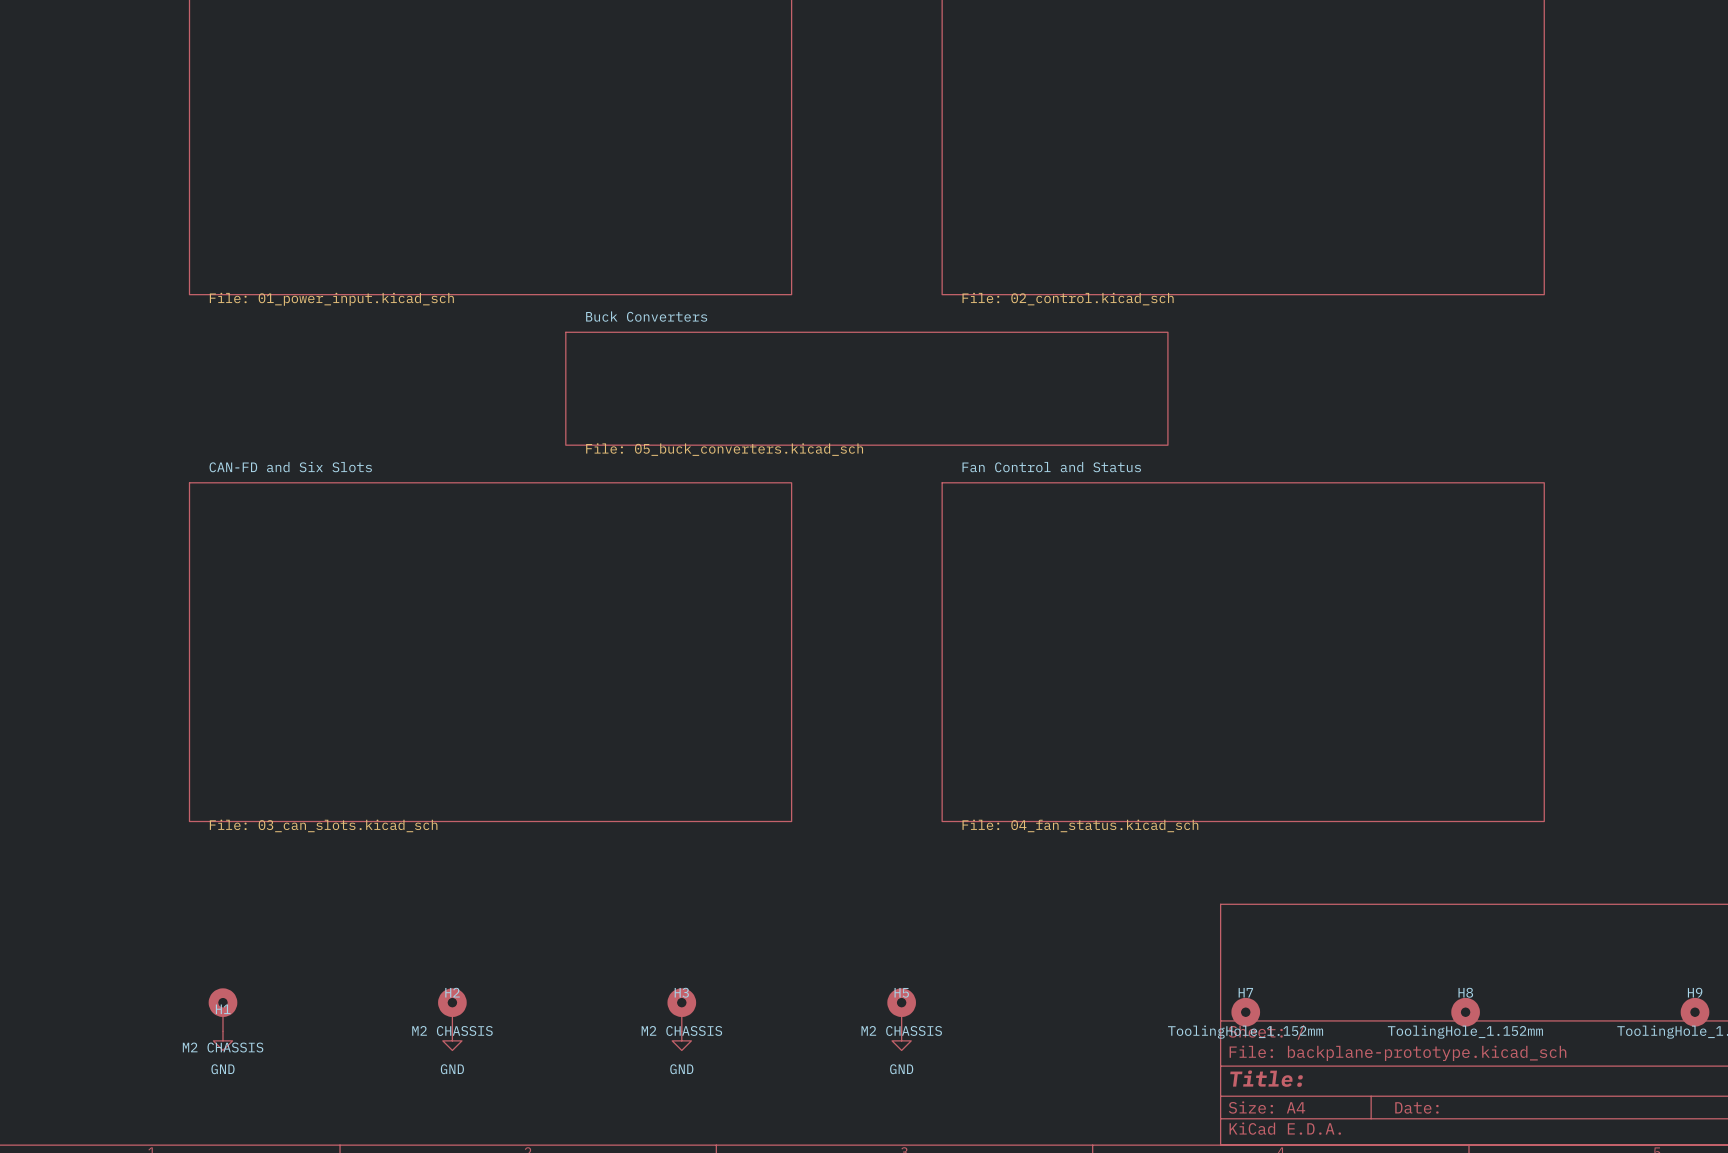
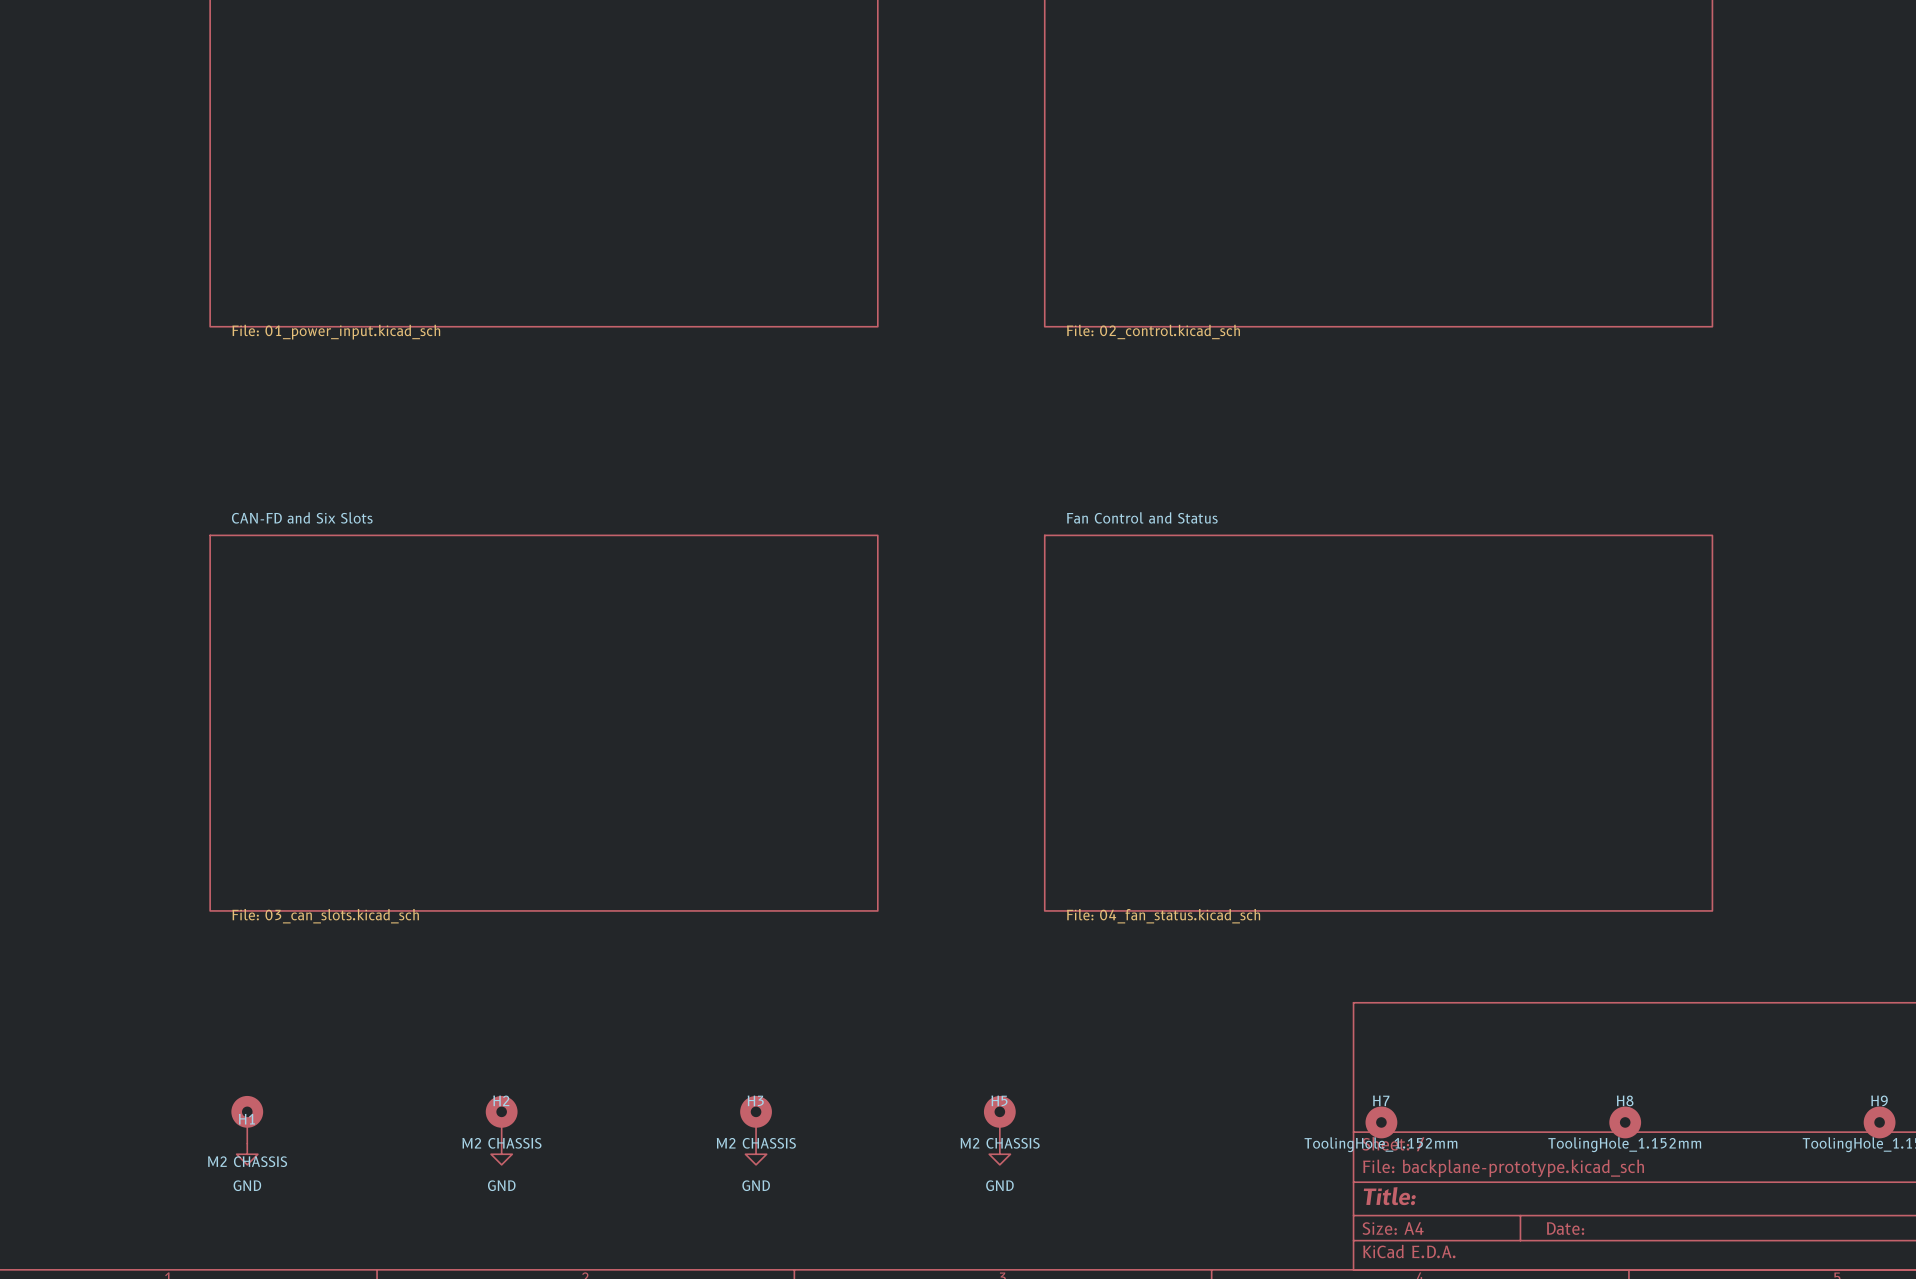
sheet Buck Converters: File: 05_buck_converters.kicad_sch (866, 388) -> none

